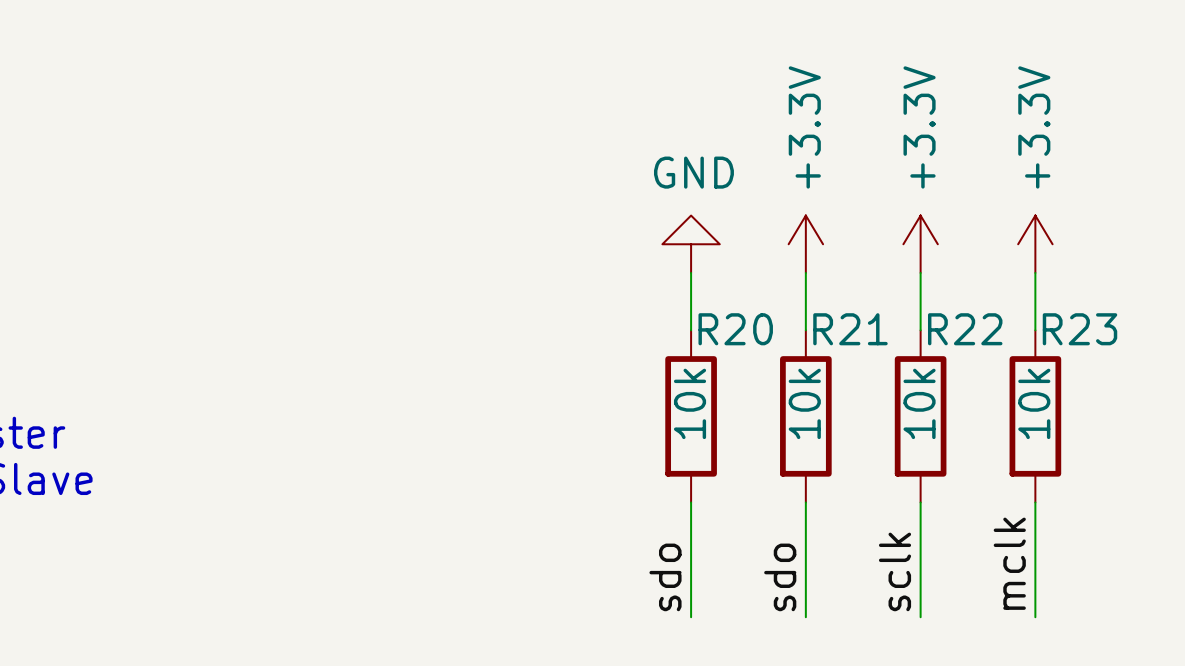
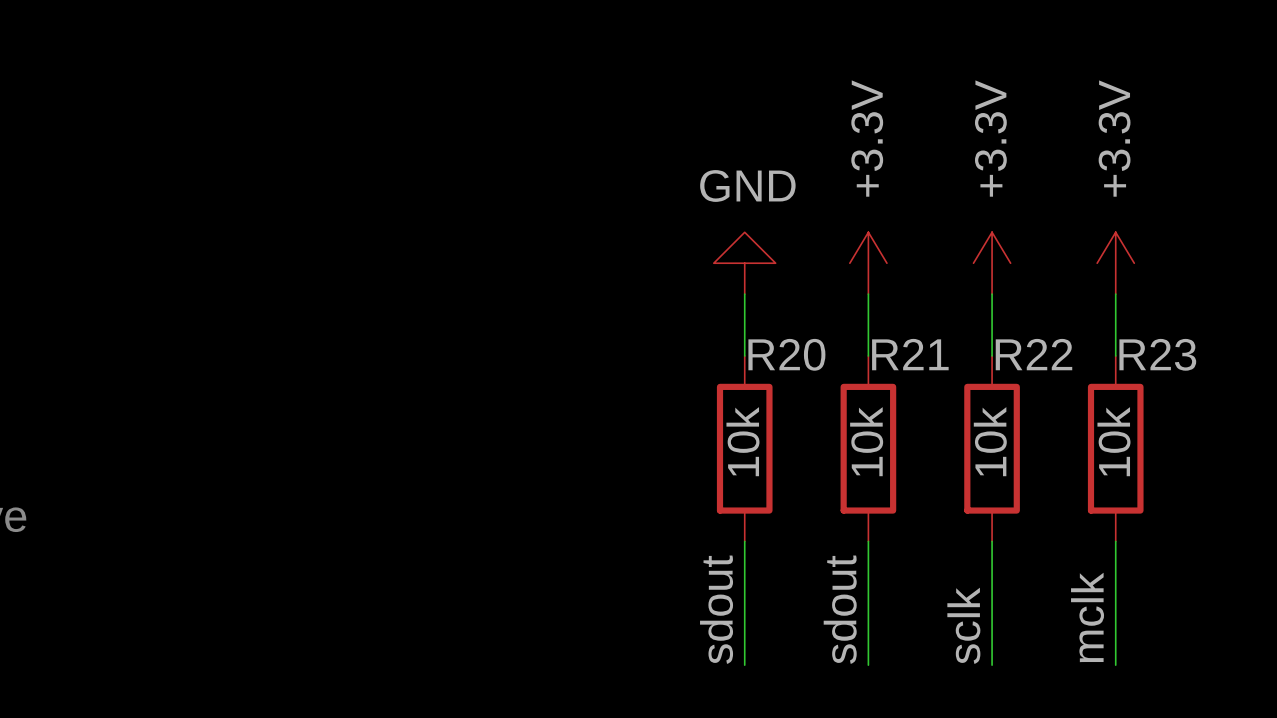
label: sdo (665, 577) -> sdout (716, 609)
label: sdo (780, 577) -> sdout (840, 609)

